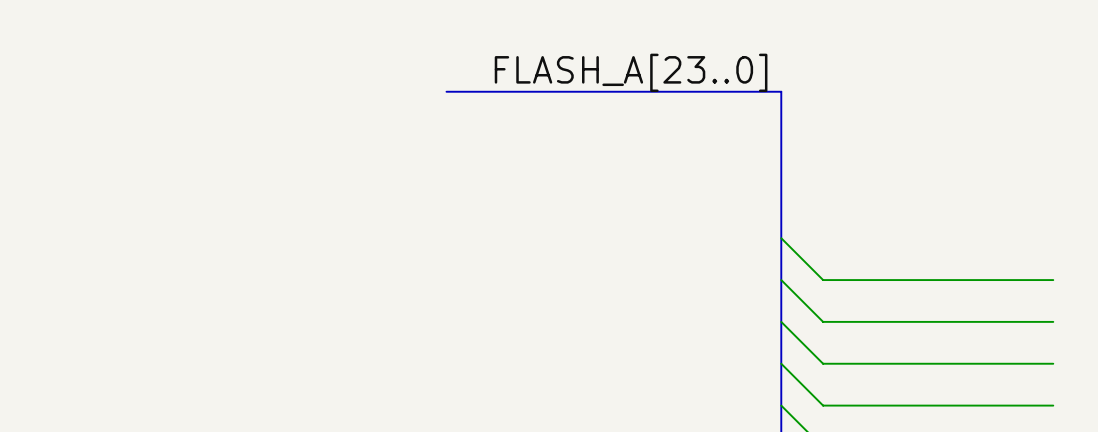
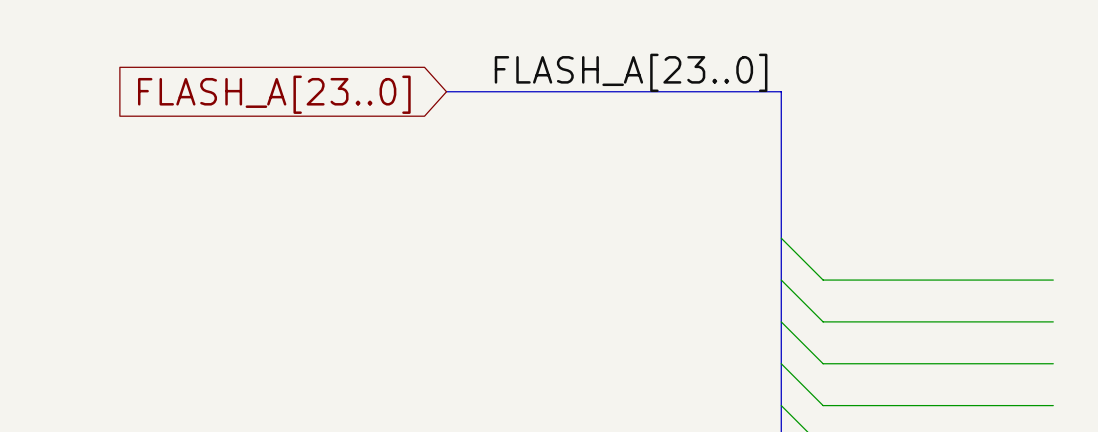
global label: none -> FLASH_A[23..0] (274, 94)

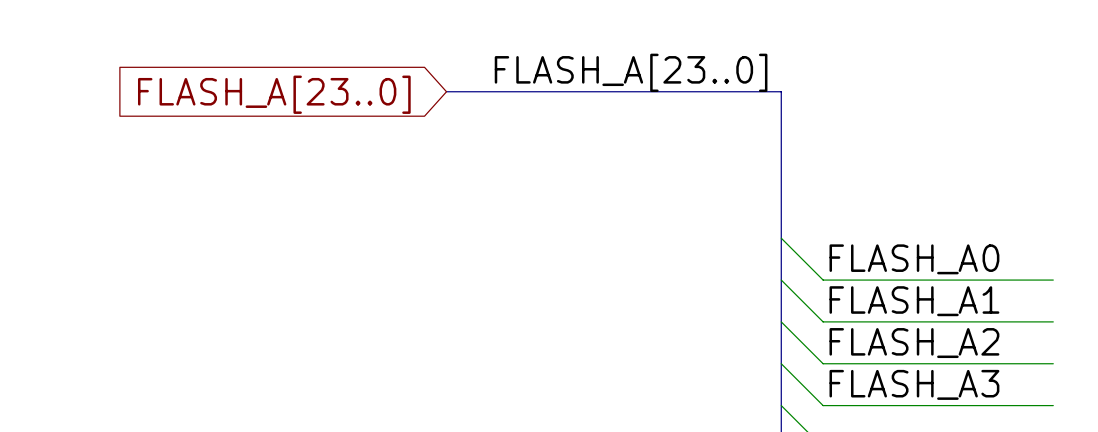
label: none -> FLASH_A0 (914, 259)
label: none -> FLASH_A1 (914, 301)
label: none -> FLASH_A2 (914, 343)
label: none -> FLASH_A3 (914, 384)

